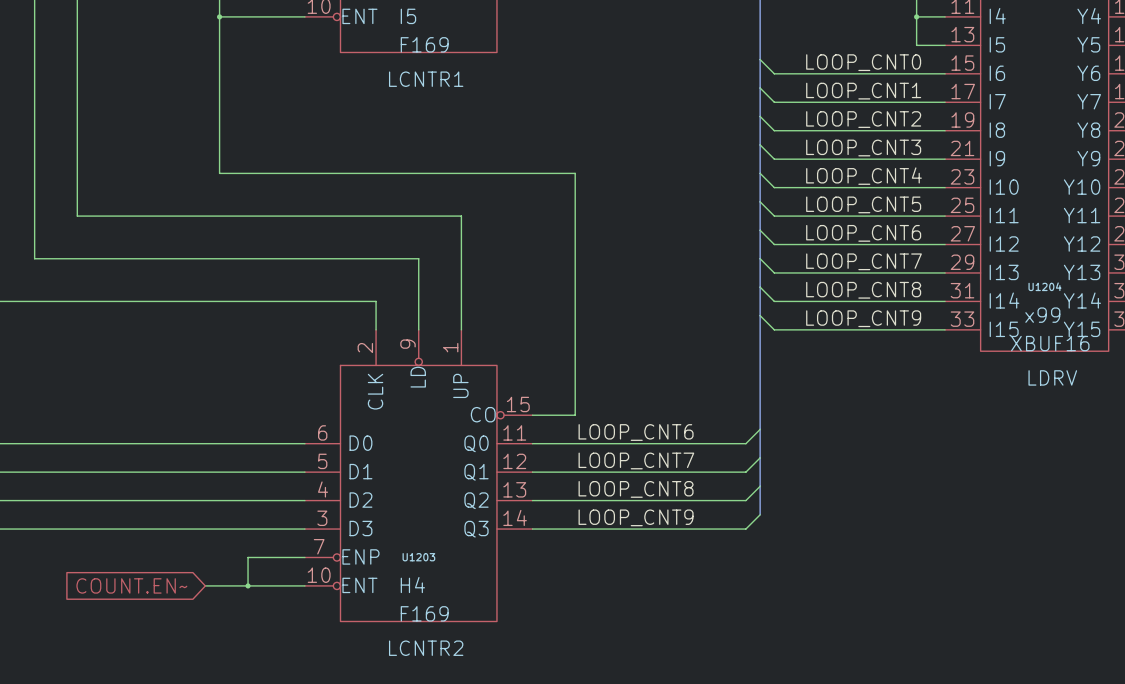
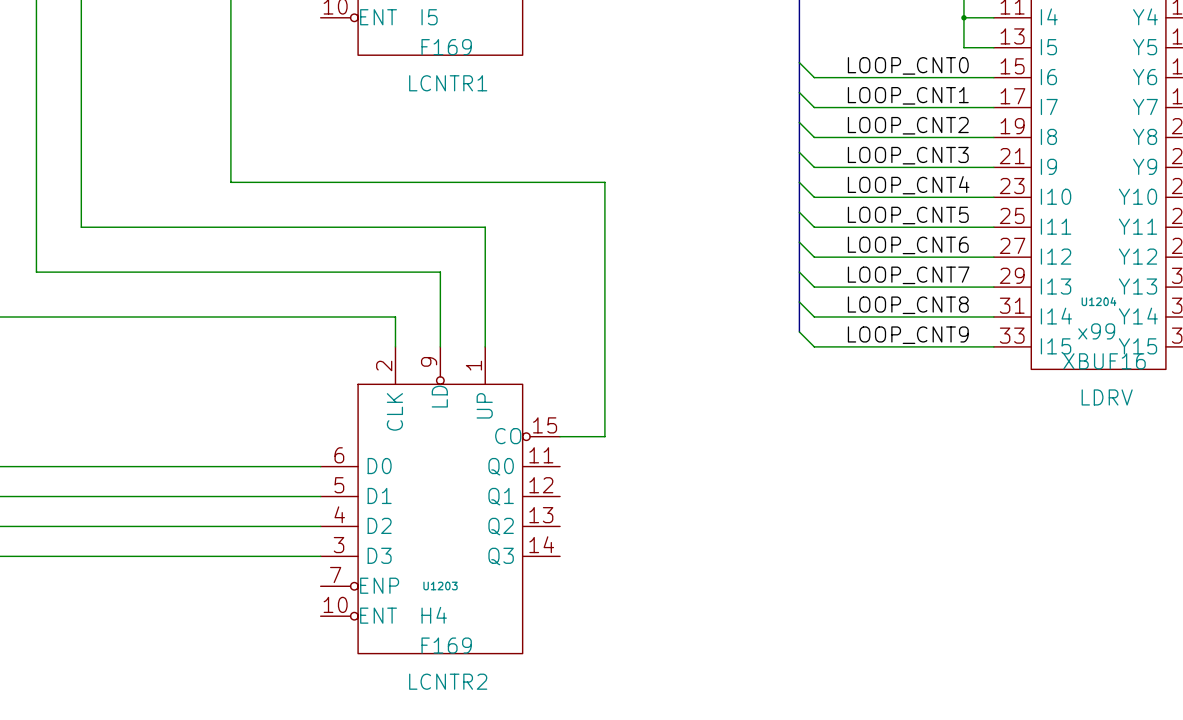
wire: (219, 16) (304, 16) -> none
junction: (219, 16) -> none
bus: (760, 315) (760, 514) -> none
wire: (760, 429) (745, 443) (532, 443) -> none
label: LOOP_CNT6 (636, 432) -> none
wire: (760, 457) (745, 472) (532, 472) -> none
label: LOOP_CNT7 (636, 460) -> none
wire: (760, 486) (745, 500) (532, 500) -> none
label: LOOP_CNT8 (636, 489) -> none
wire: (760, 514) (745, 529) (532, 529) -> none
label: LOOP_CNT9 (636, 517) -> none
wire: (304, 557) (248, 557) (248, 585) -> none
global label: COUNT.EN~ (131, 585) -> none
wire: (205, 585) (304, 585) -> none
junction: (248, 585) -> none

